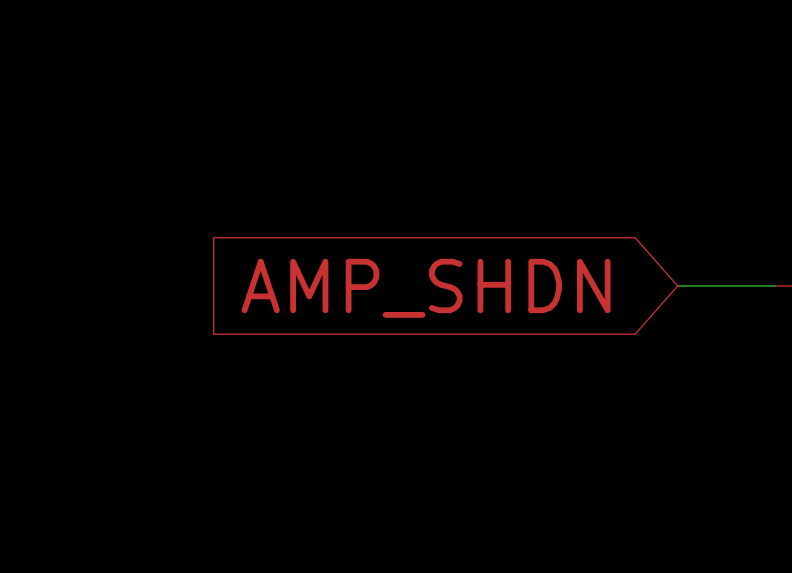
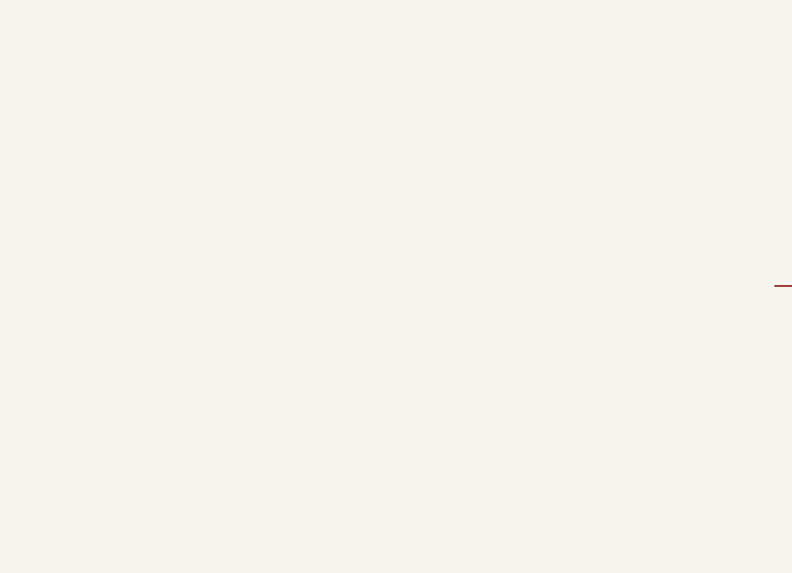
wire: (677, 285) (774, 285) -> none
global label: AMP_SHDN (426, 288) -> none

